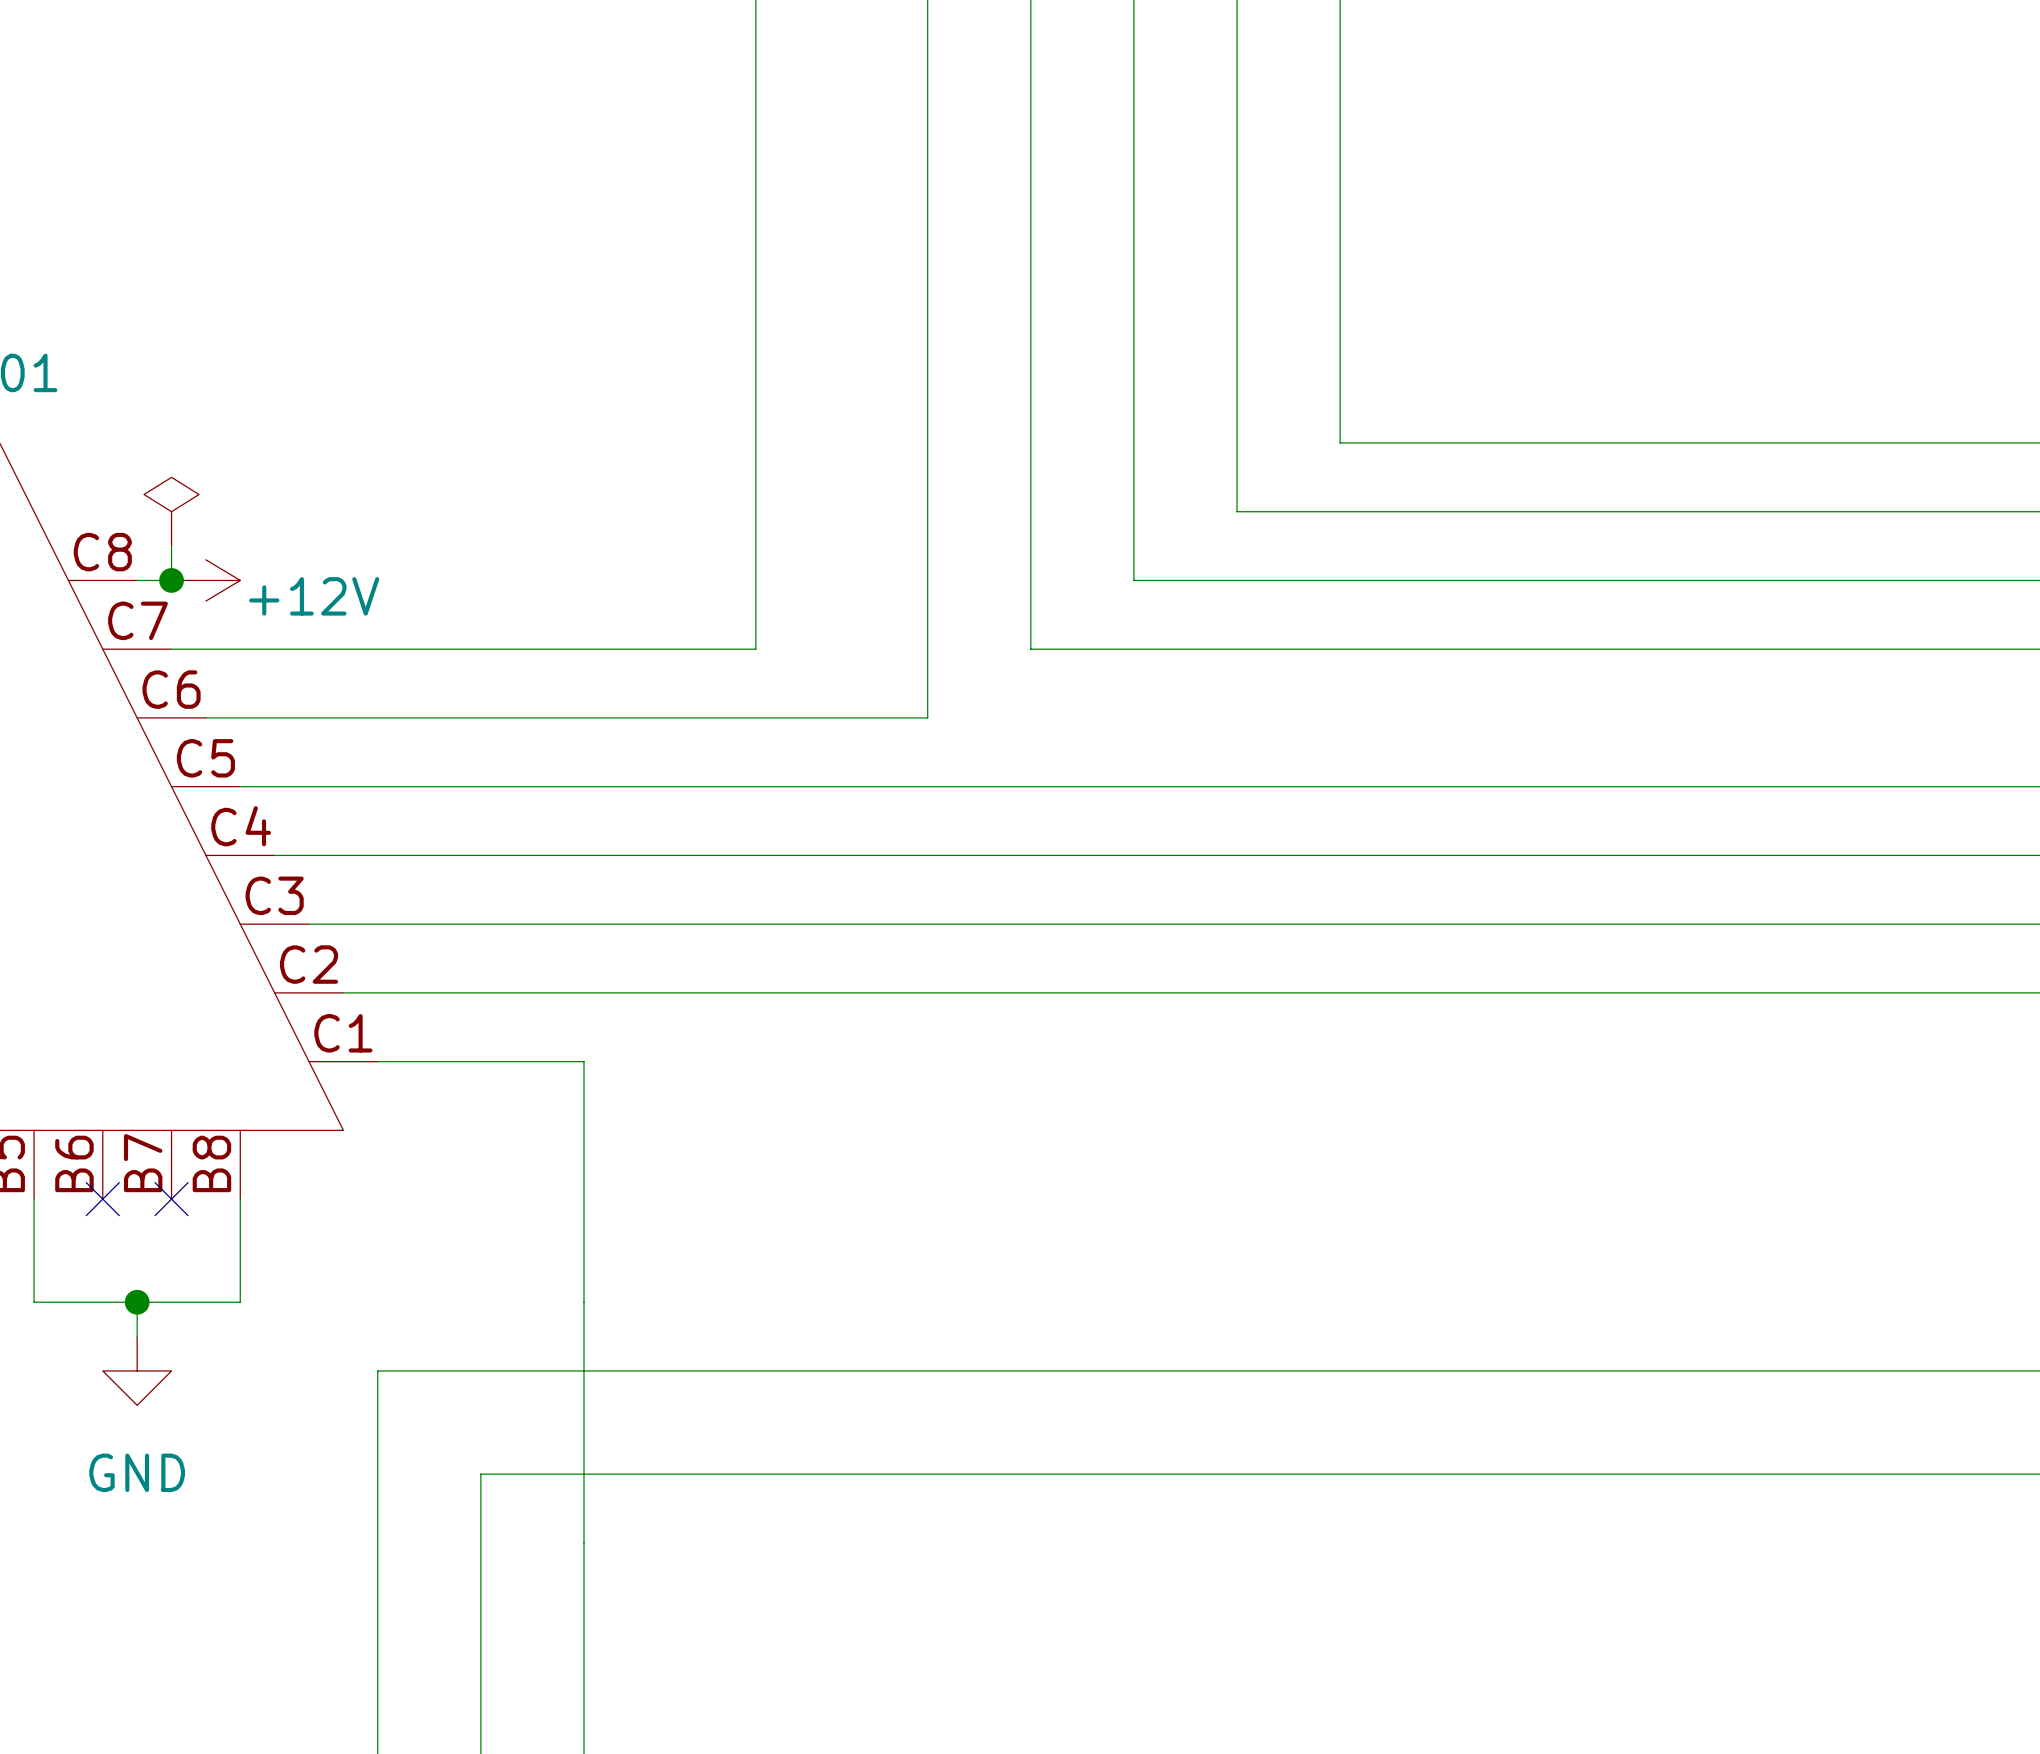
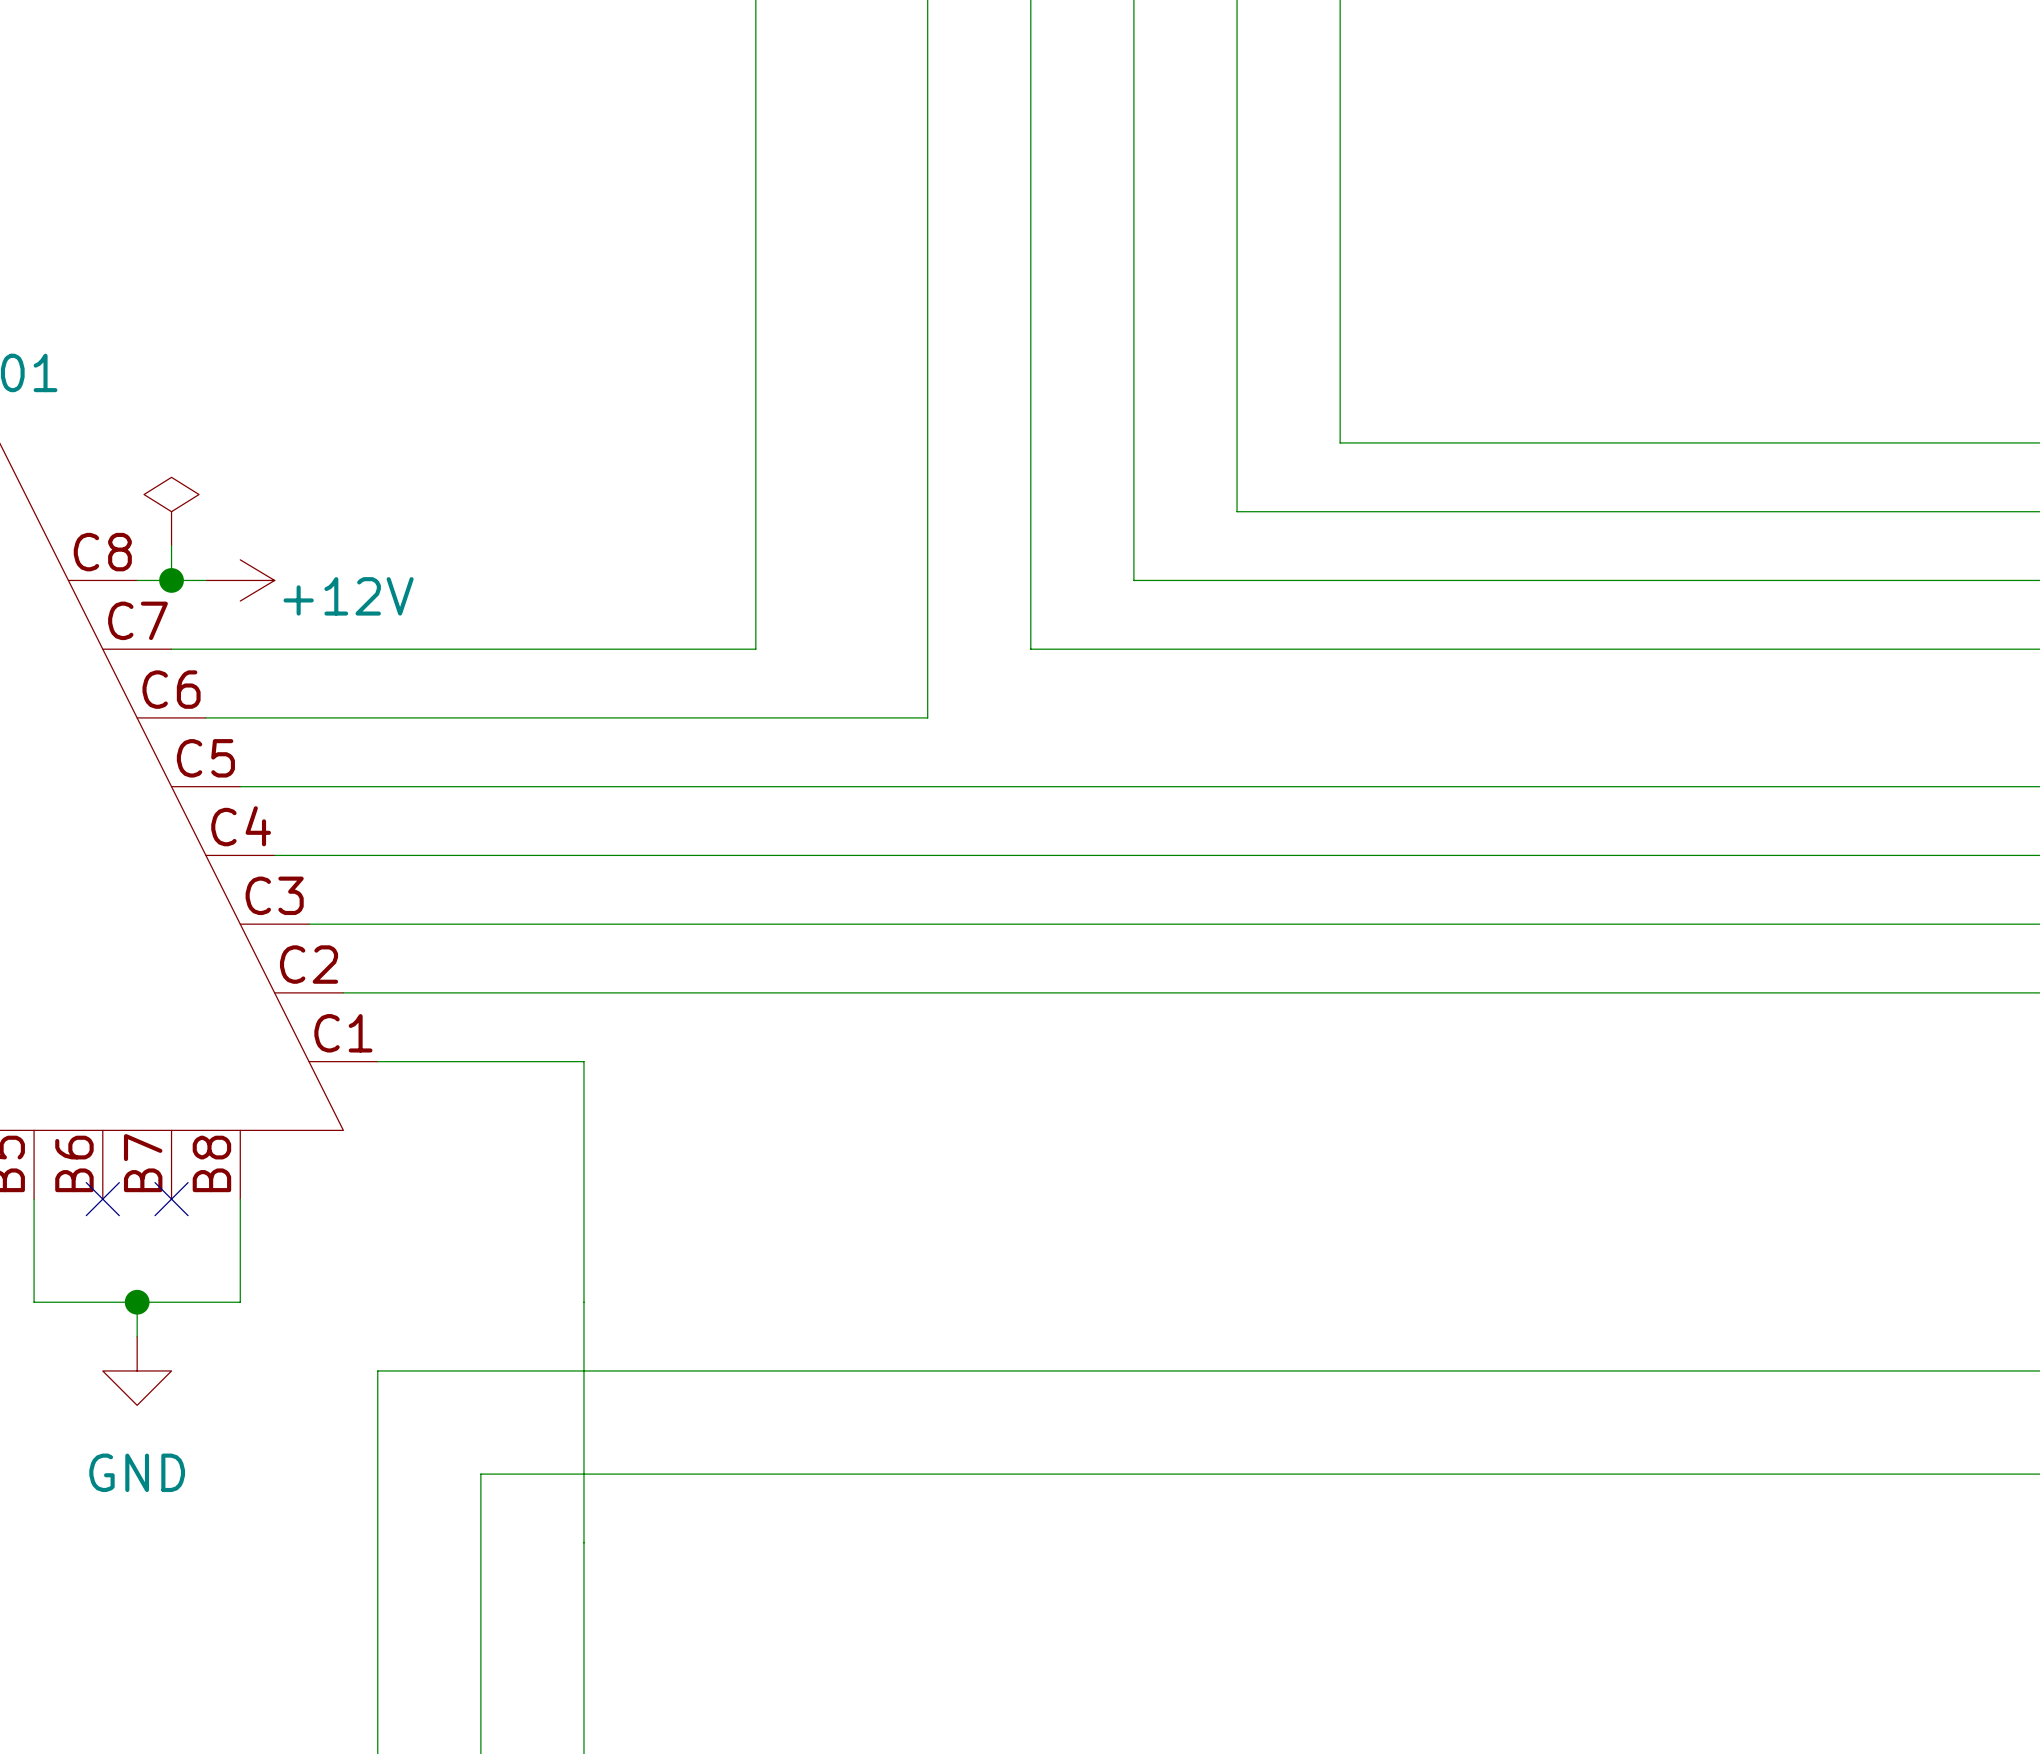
power symbol position: +12V (205, 580) -> +12V (240, 580)

